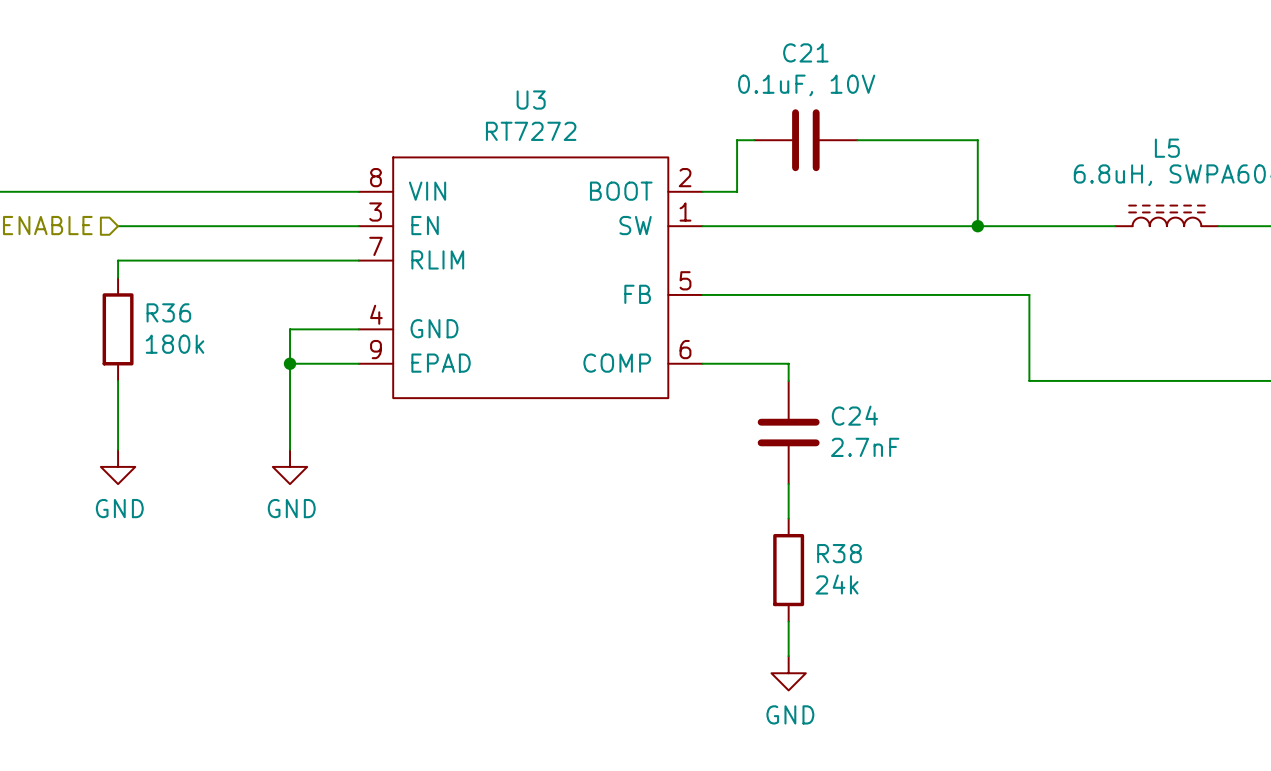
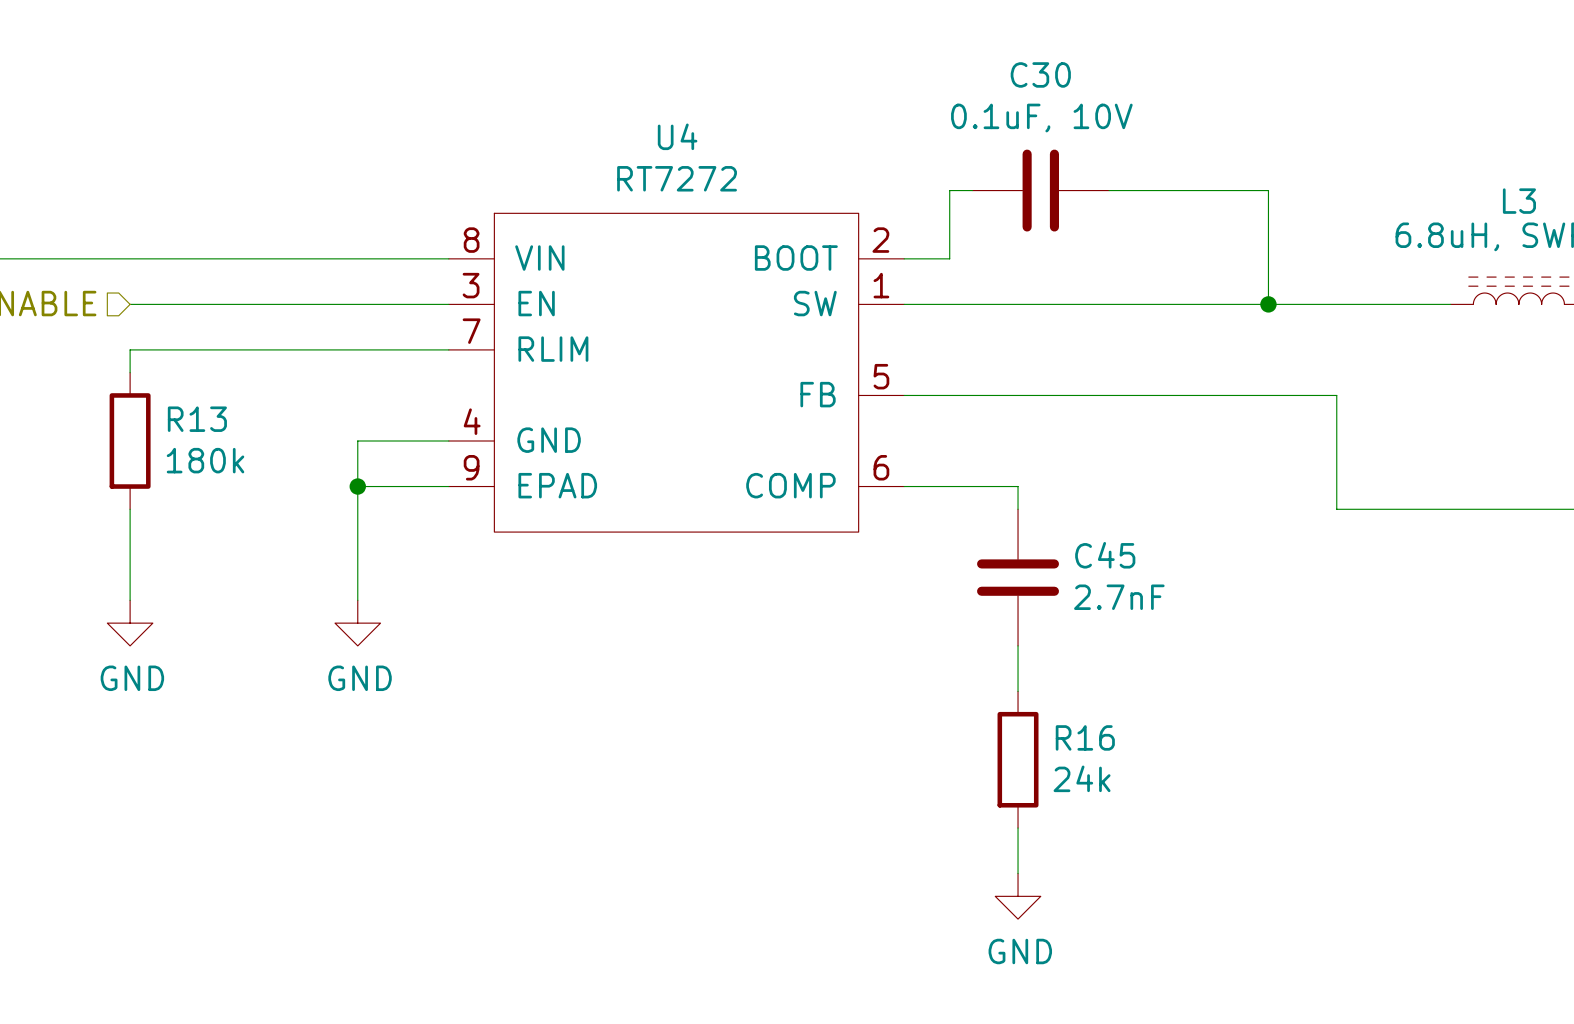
C21 name: C21 (805, 52) -> C30 (1040, 74)
U3 name: U3 (531, 100) -> U4 (677, 136)
L5 name: L5 (1167, 148) -> L3 (1519, 201)
R36 name: R36 (168, 312) -> R13 (197, 419)
C24 name: C24 (854, 415) -> C45 (1105, 555)
R38 name: R38 (839, 553) -> R16 (1085, 737)

